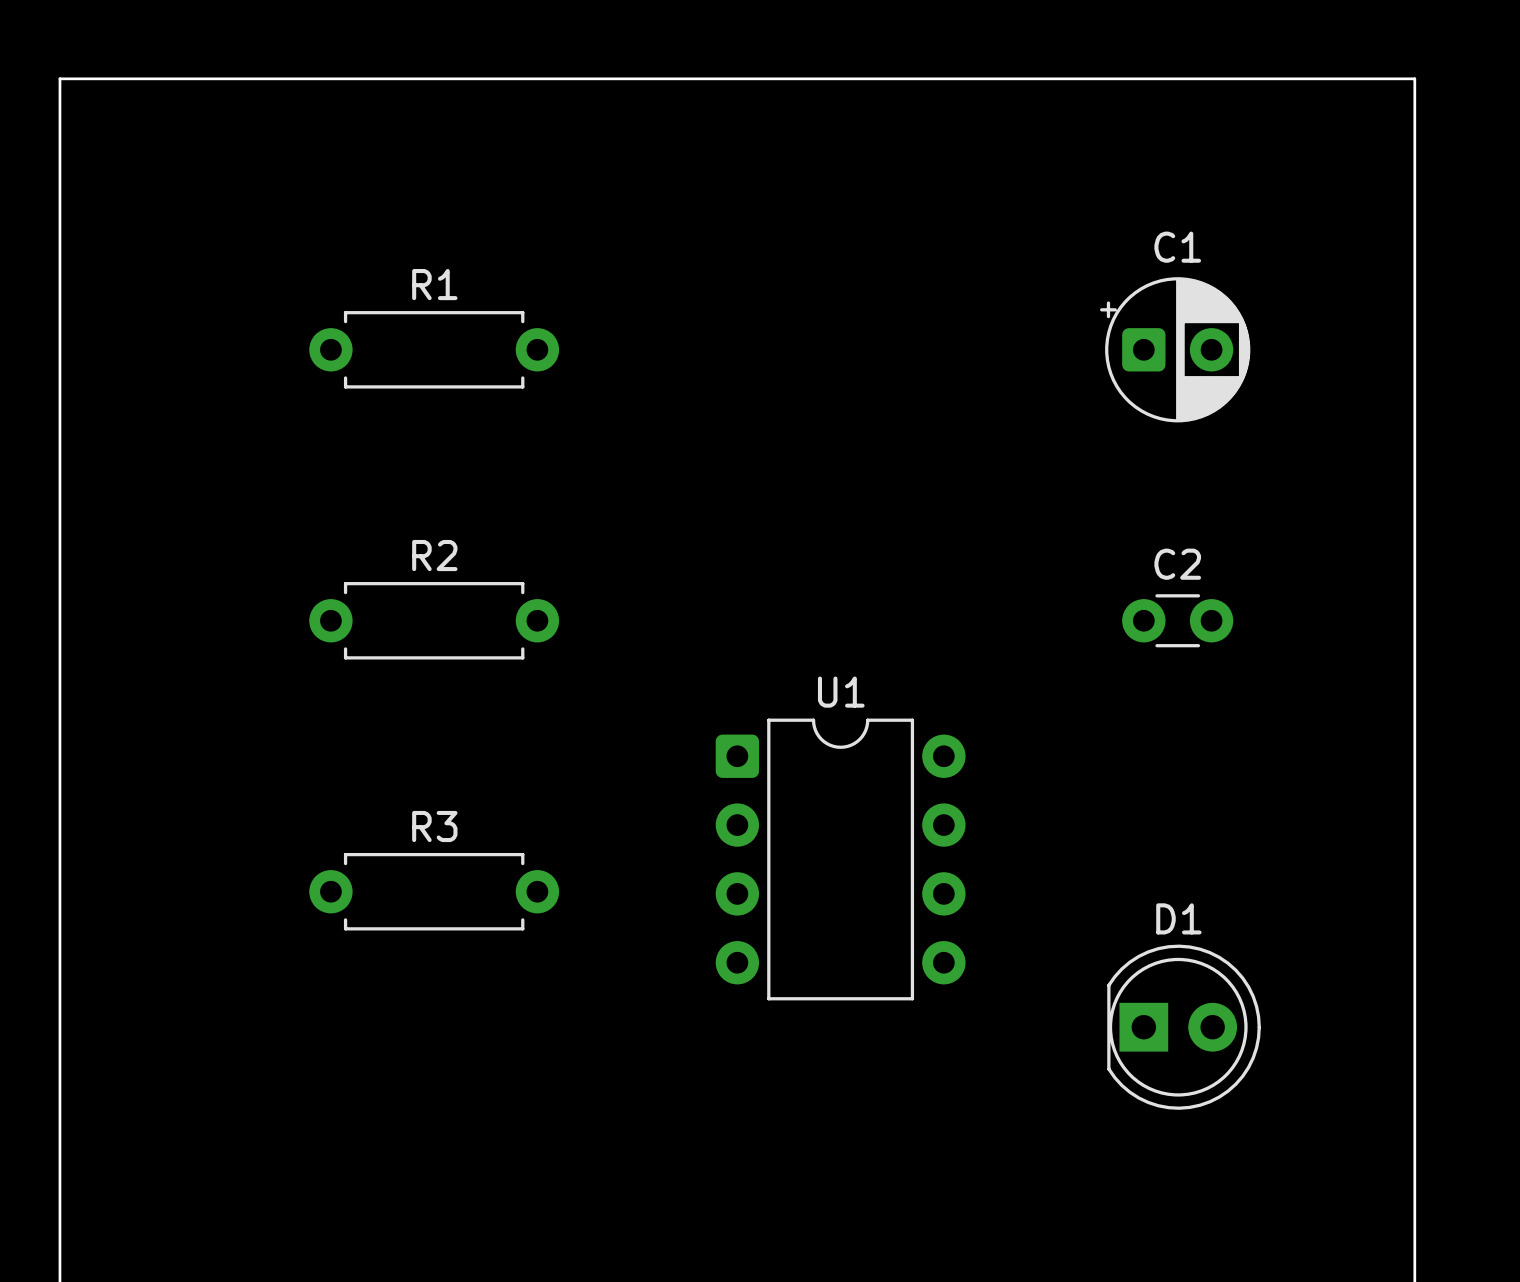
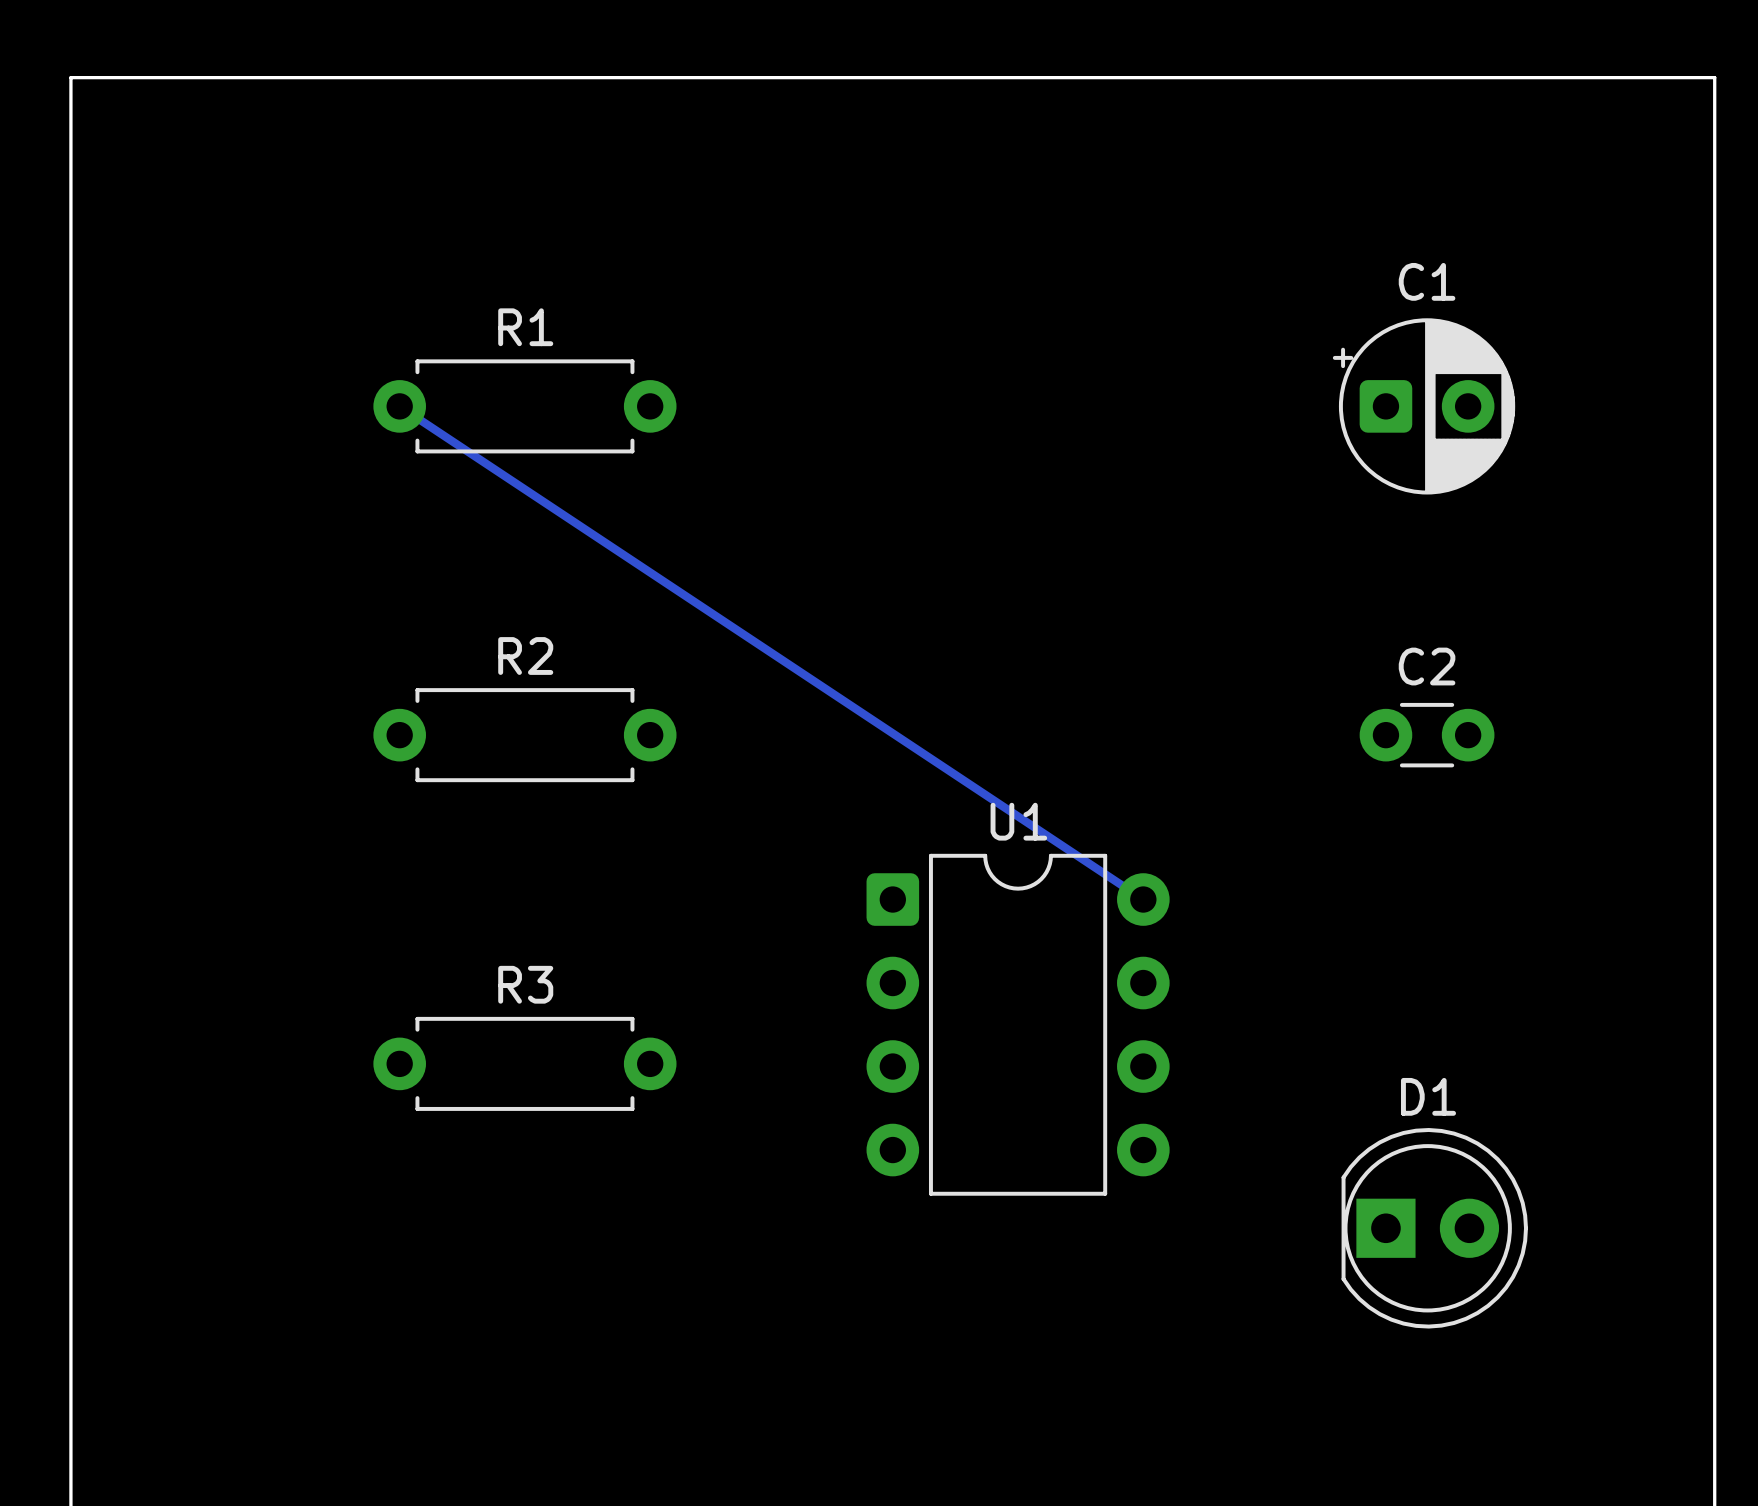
bottom track: none -> (399, 406) (1143, 899)

